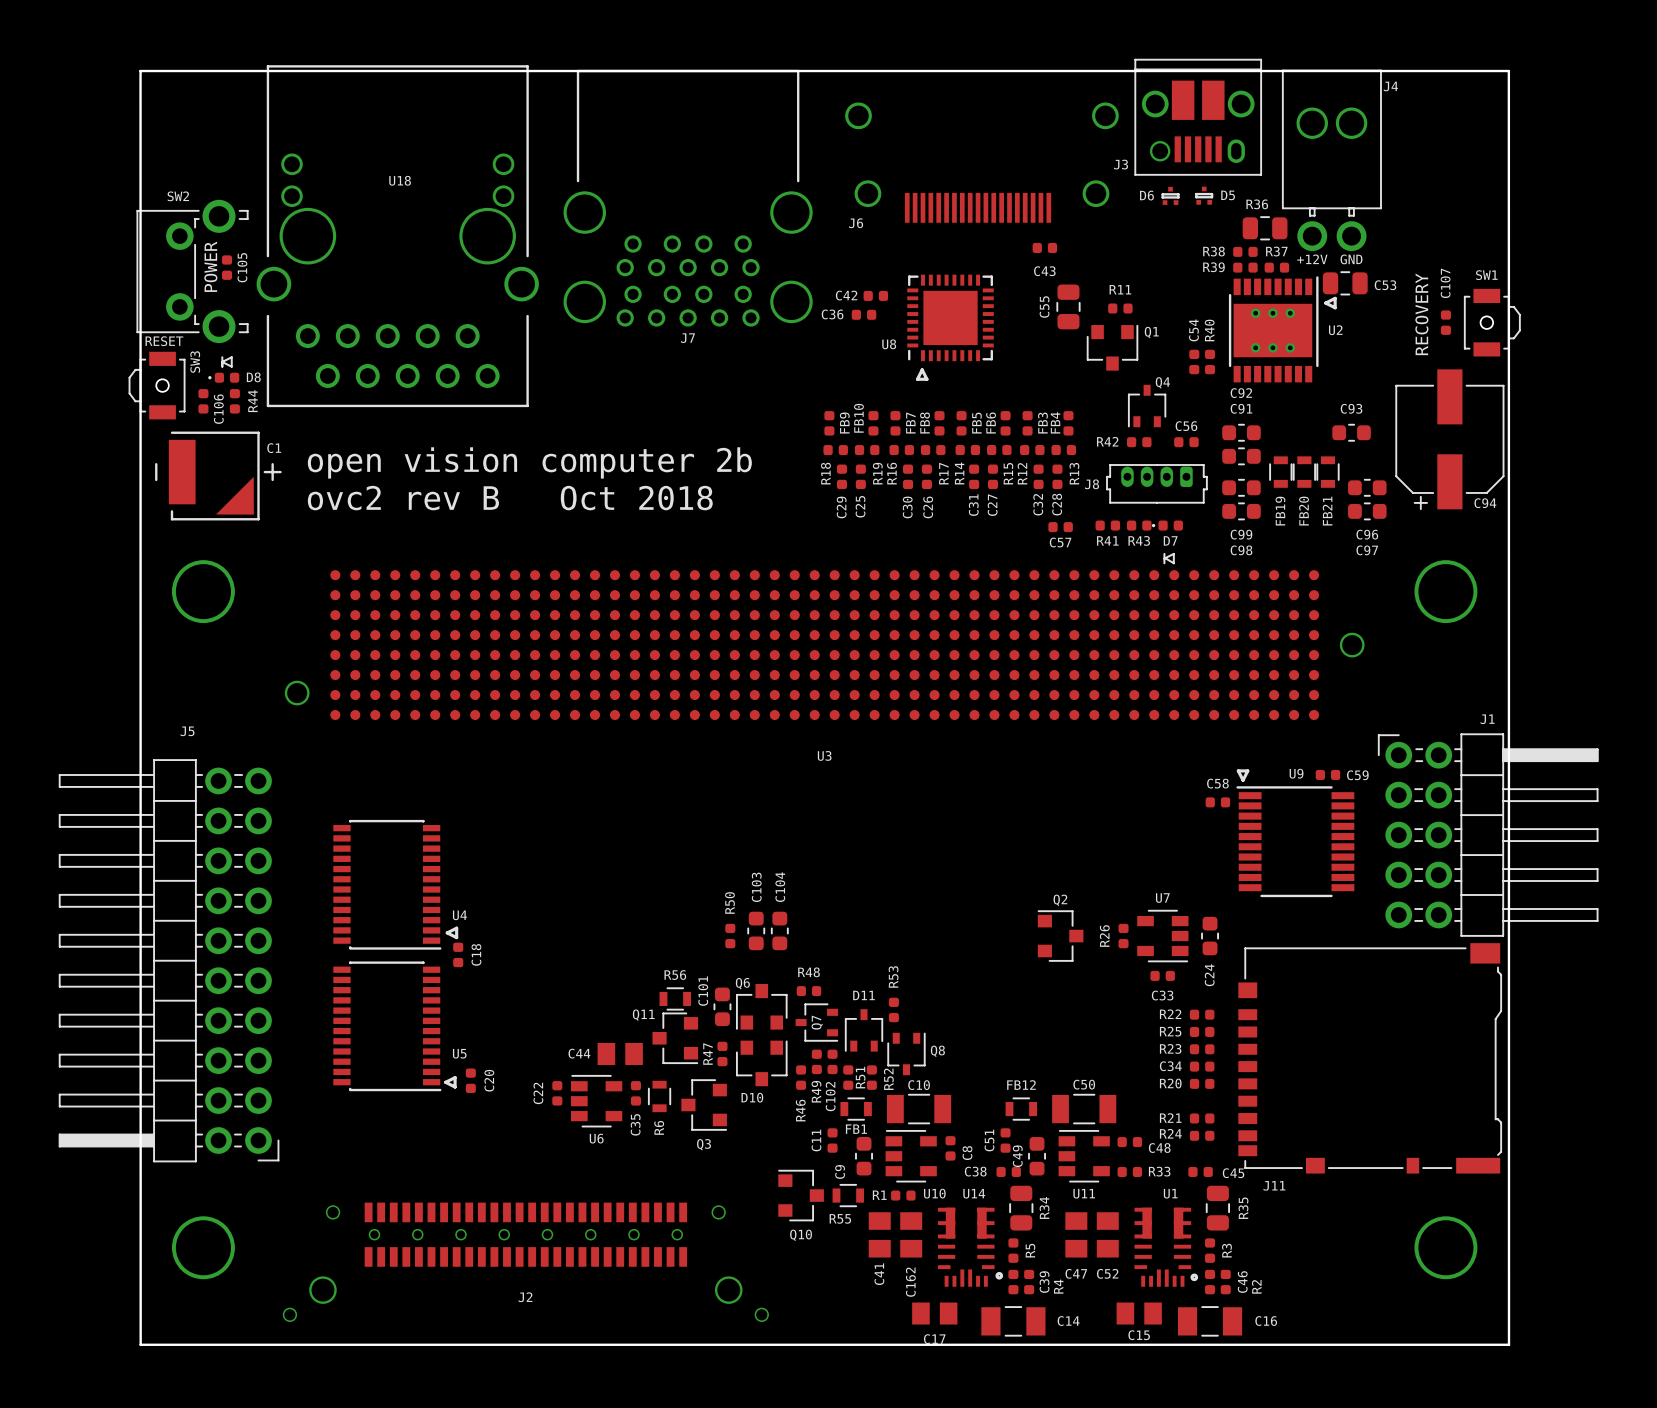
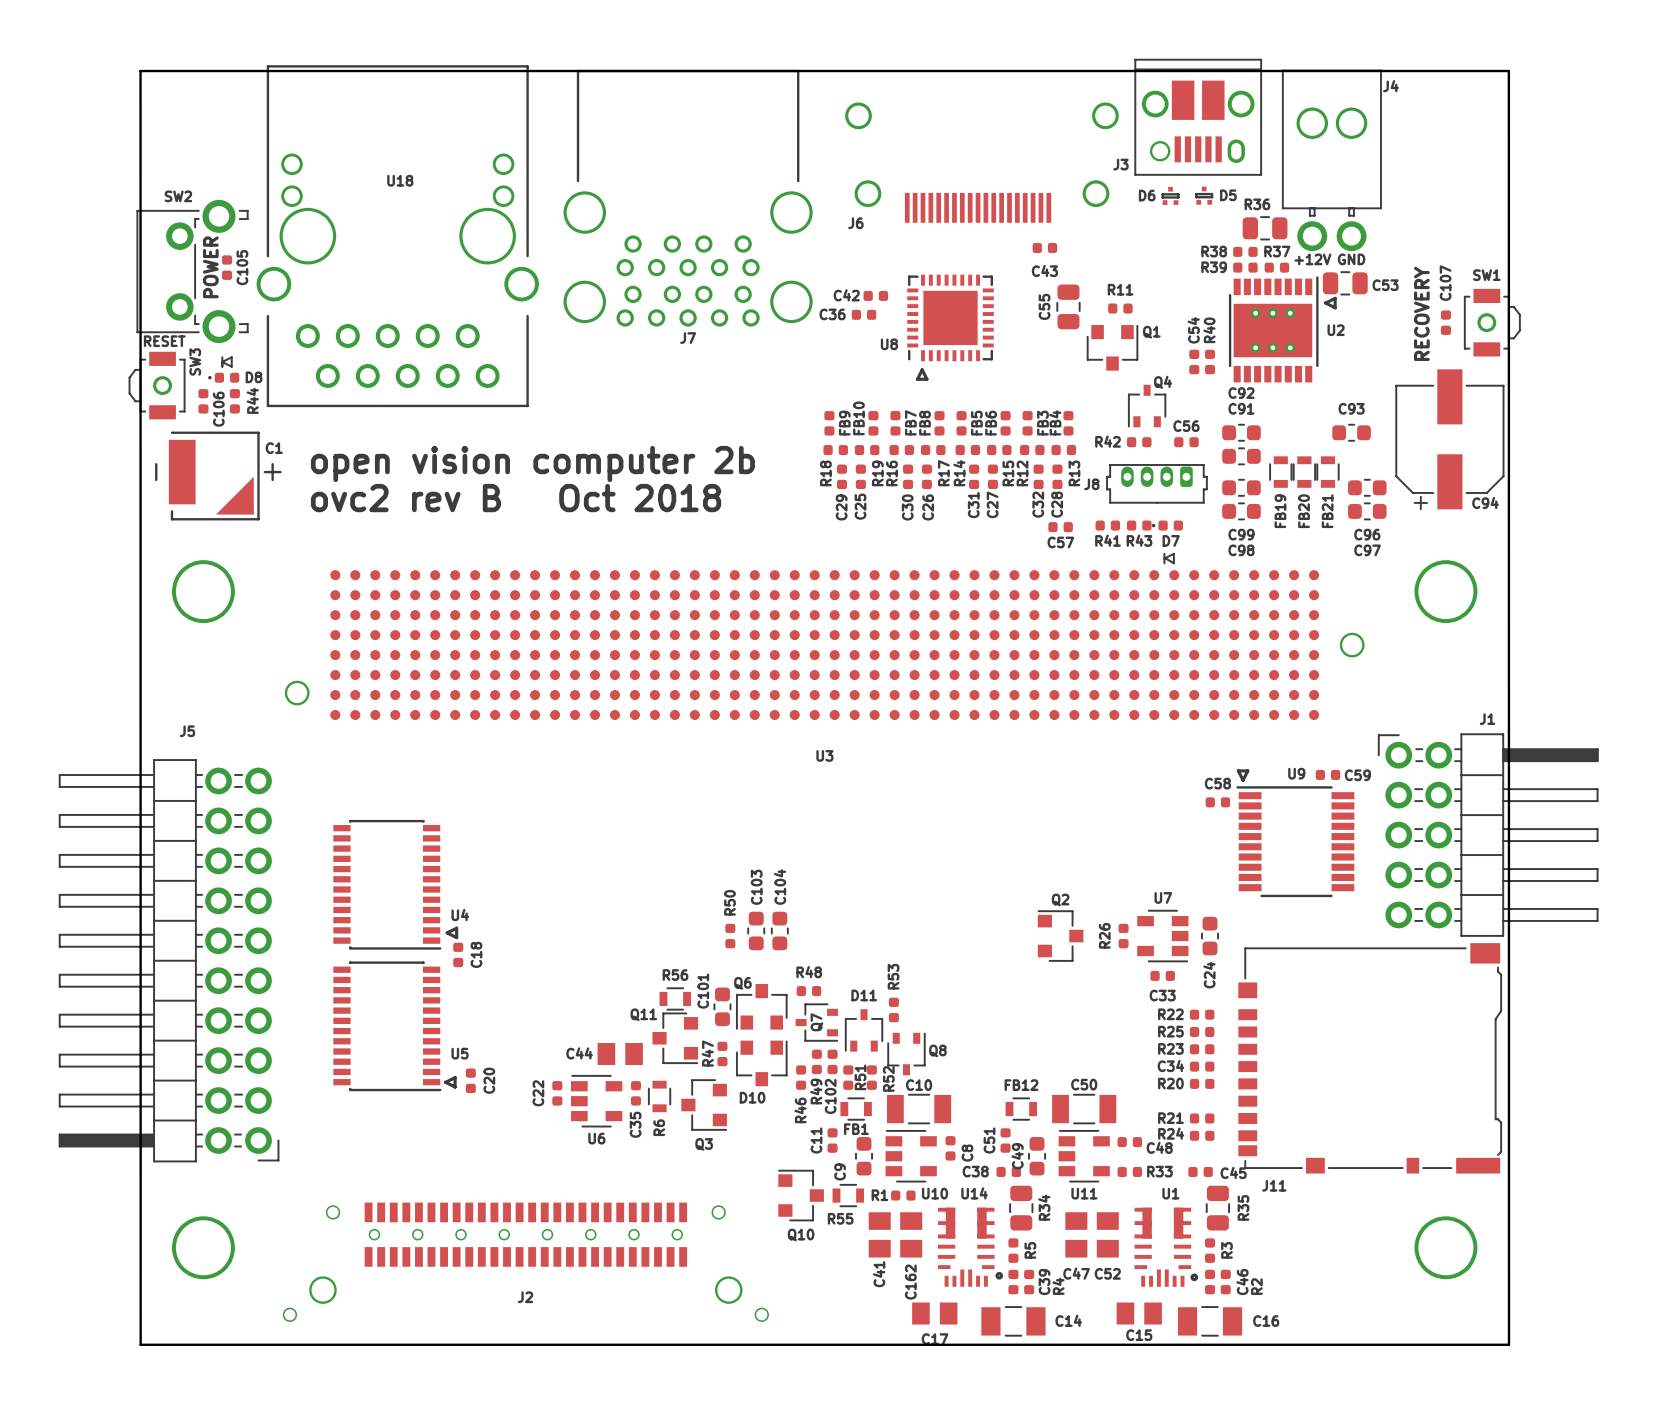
SW1 footprint: [1463, 288, 1521, 357] -> [1463, 288, 1521, 357]
SW3 footprint: [128, 351, 186, 420] -> [128, 351, 186, 420]

